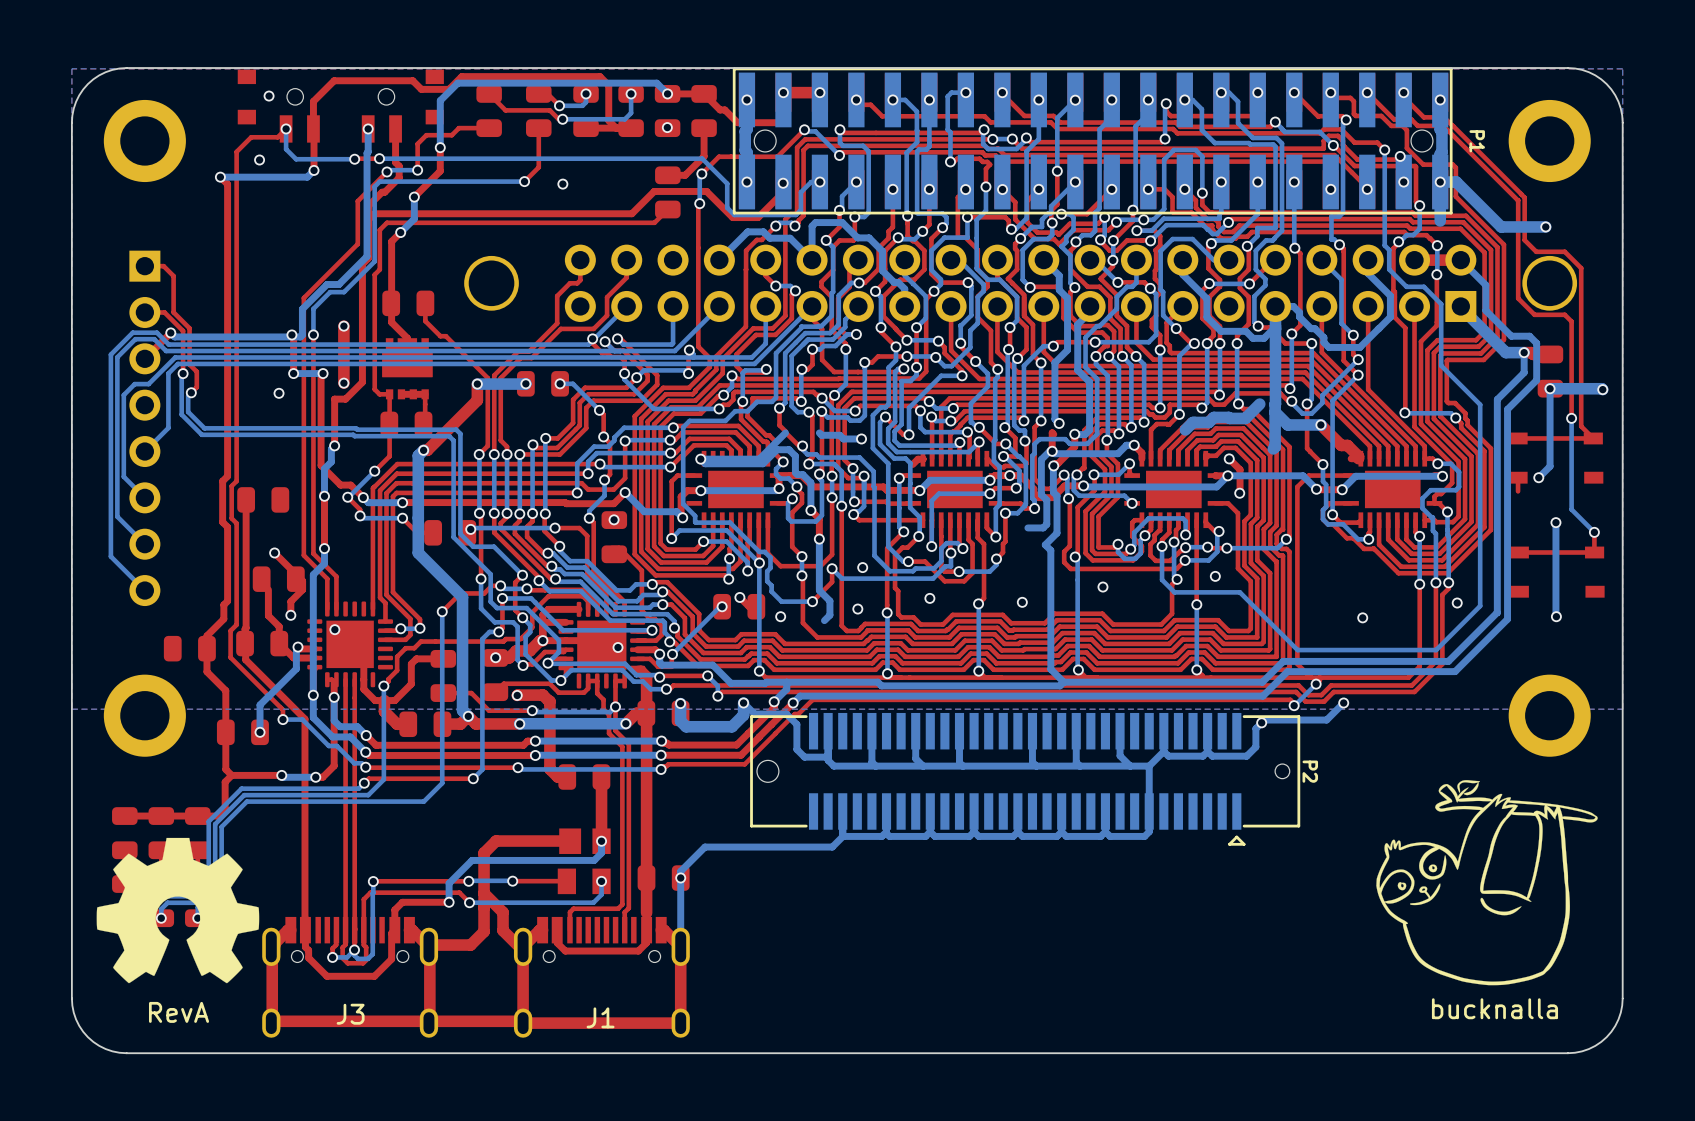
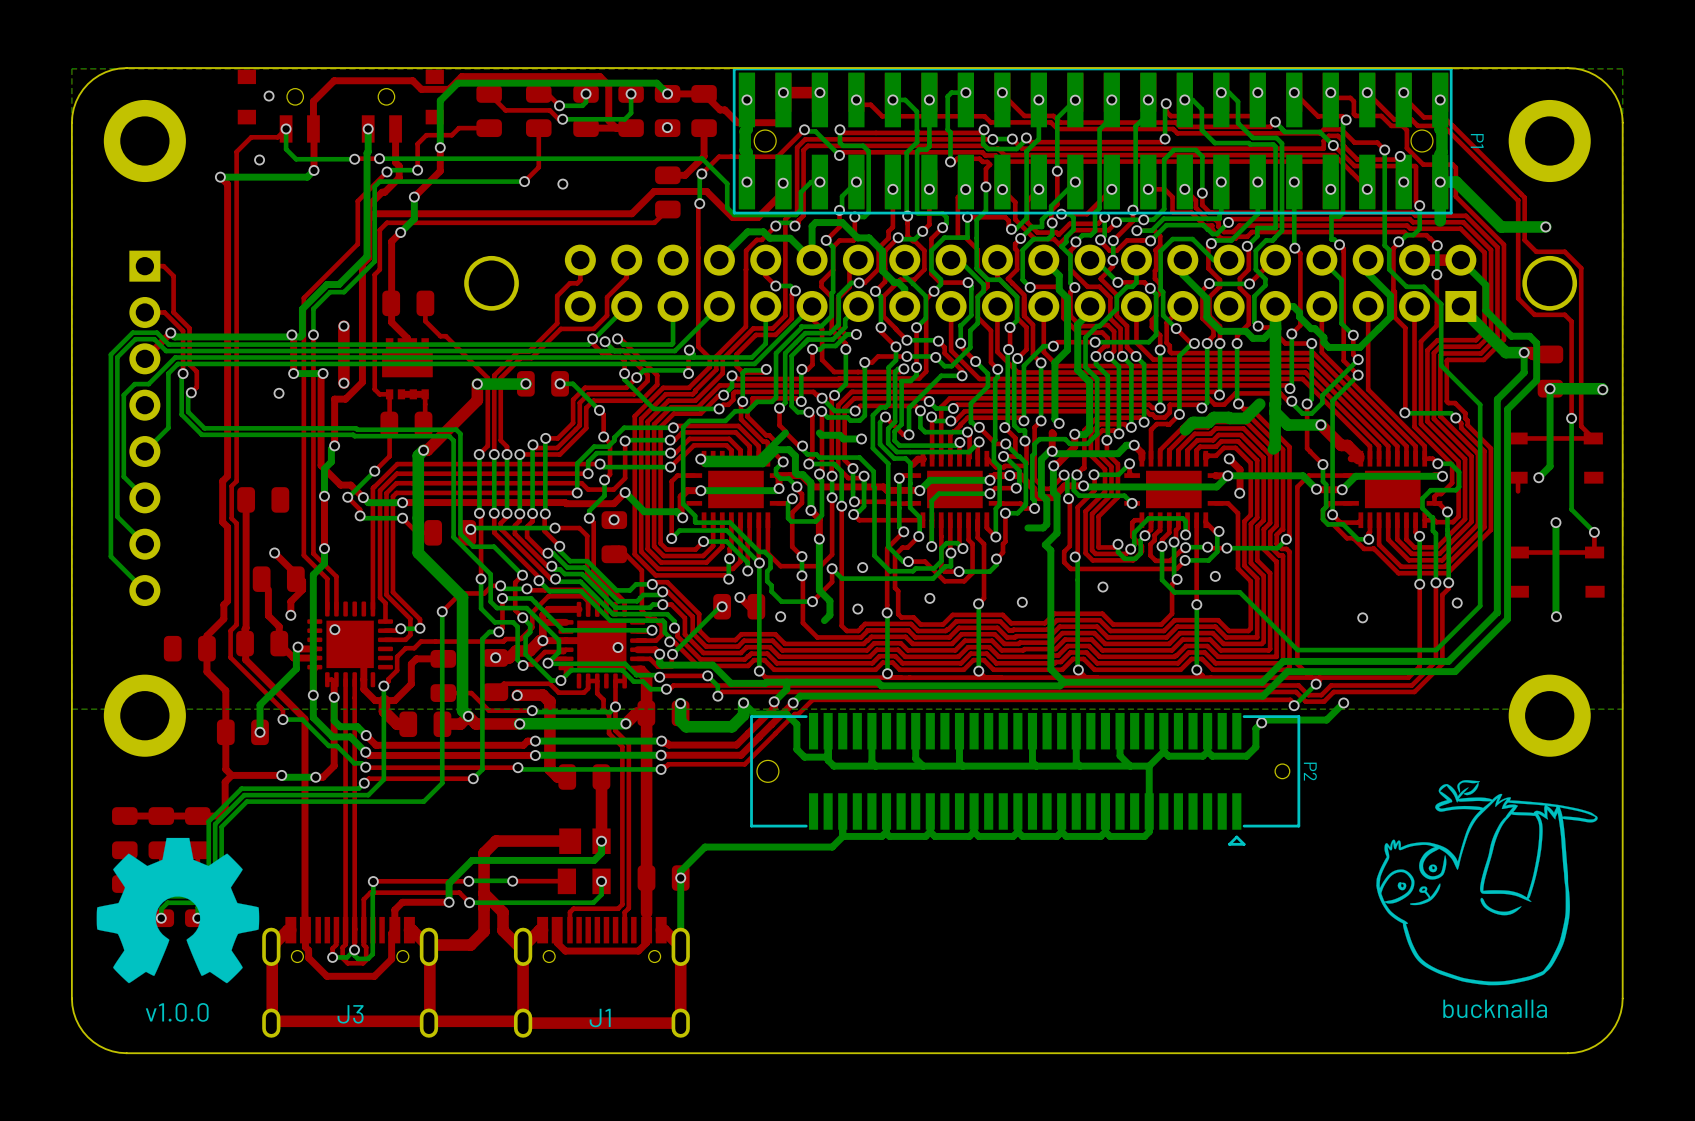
text: RevA (179, 1012) -> v1.0.0 (177, 1012)

